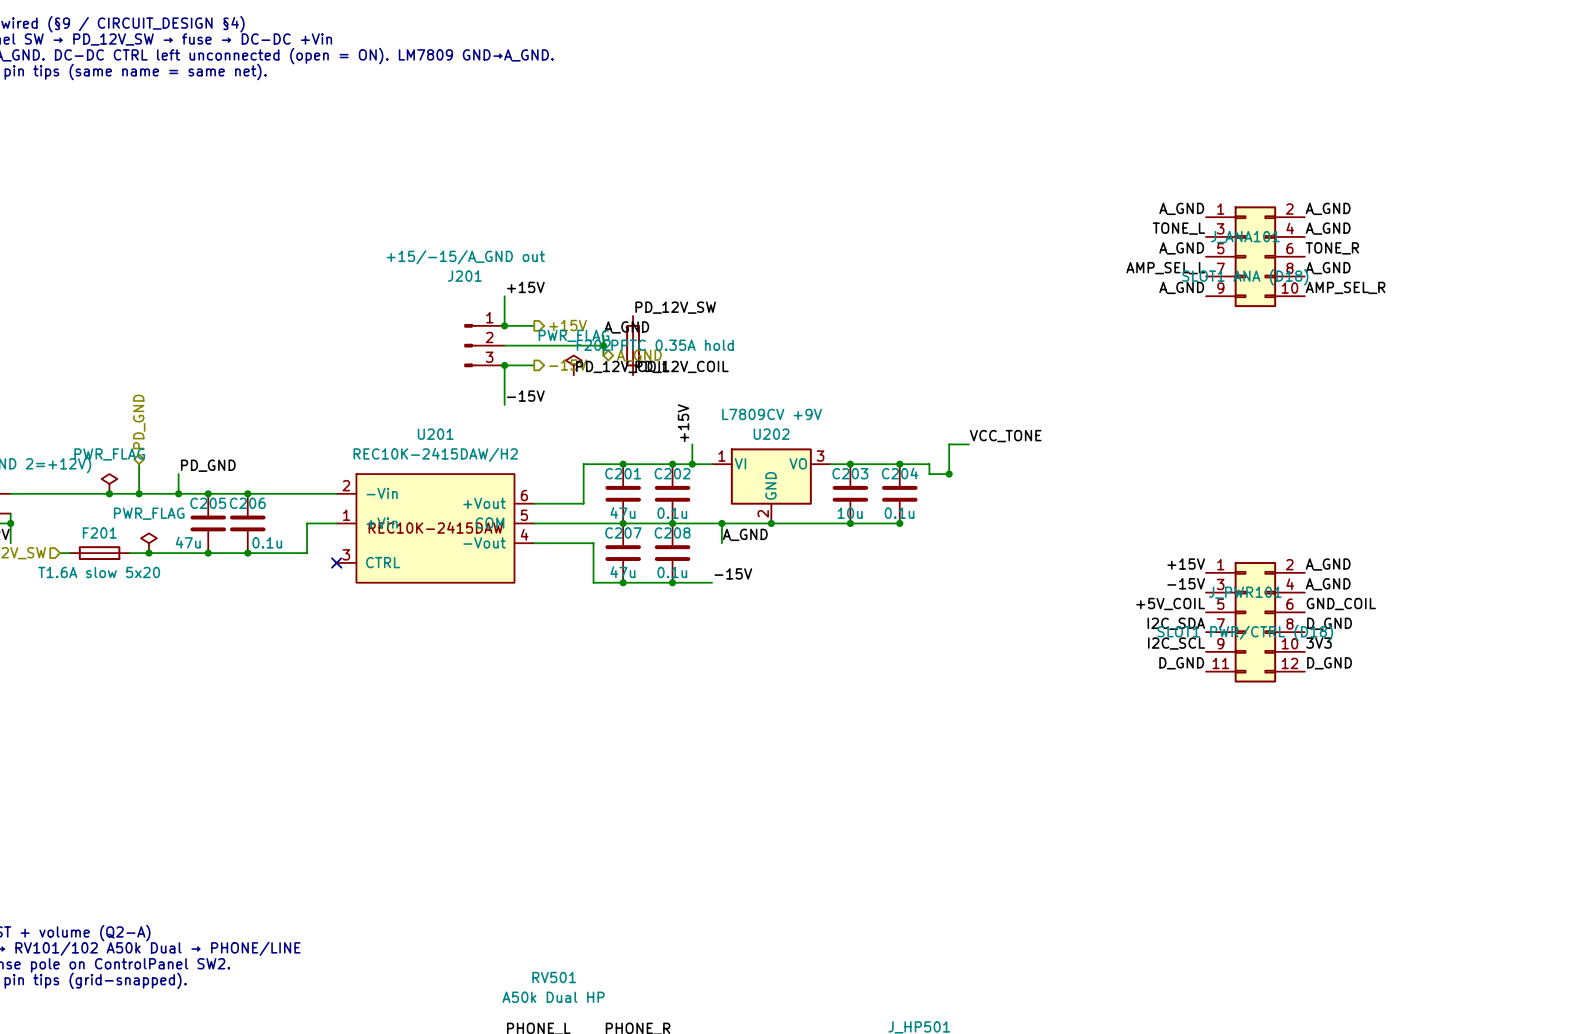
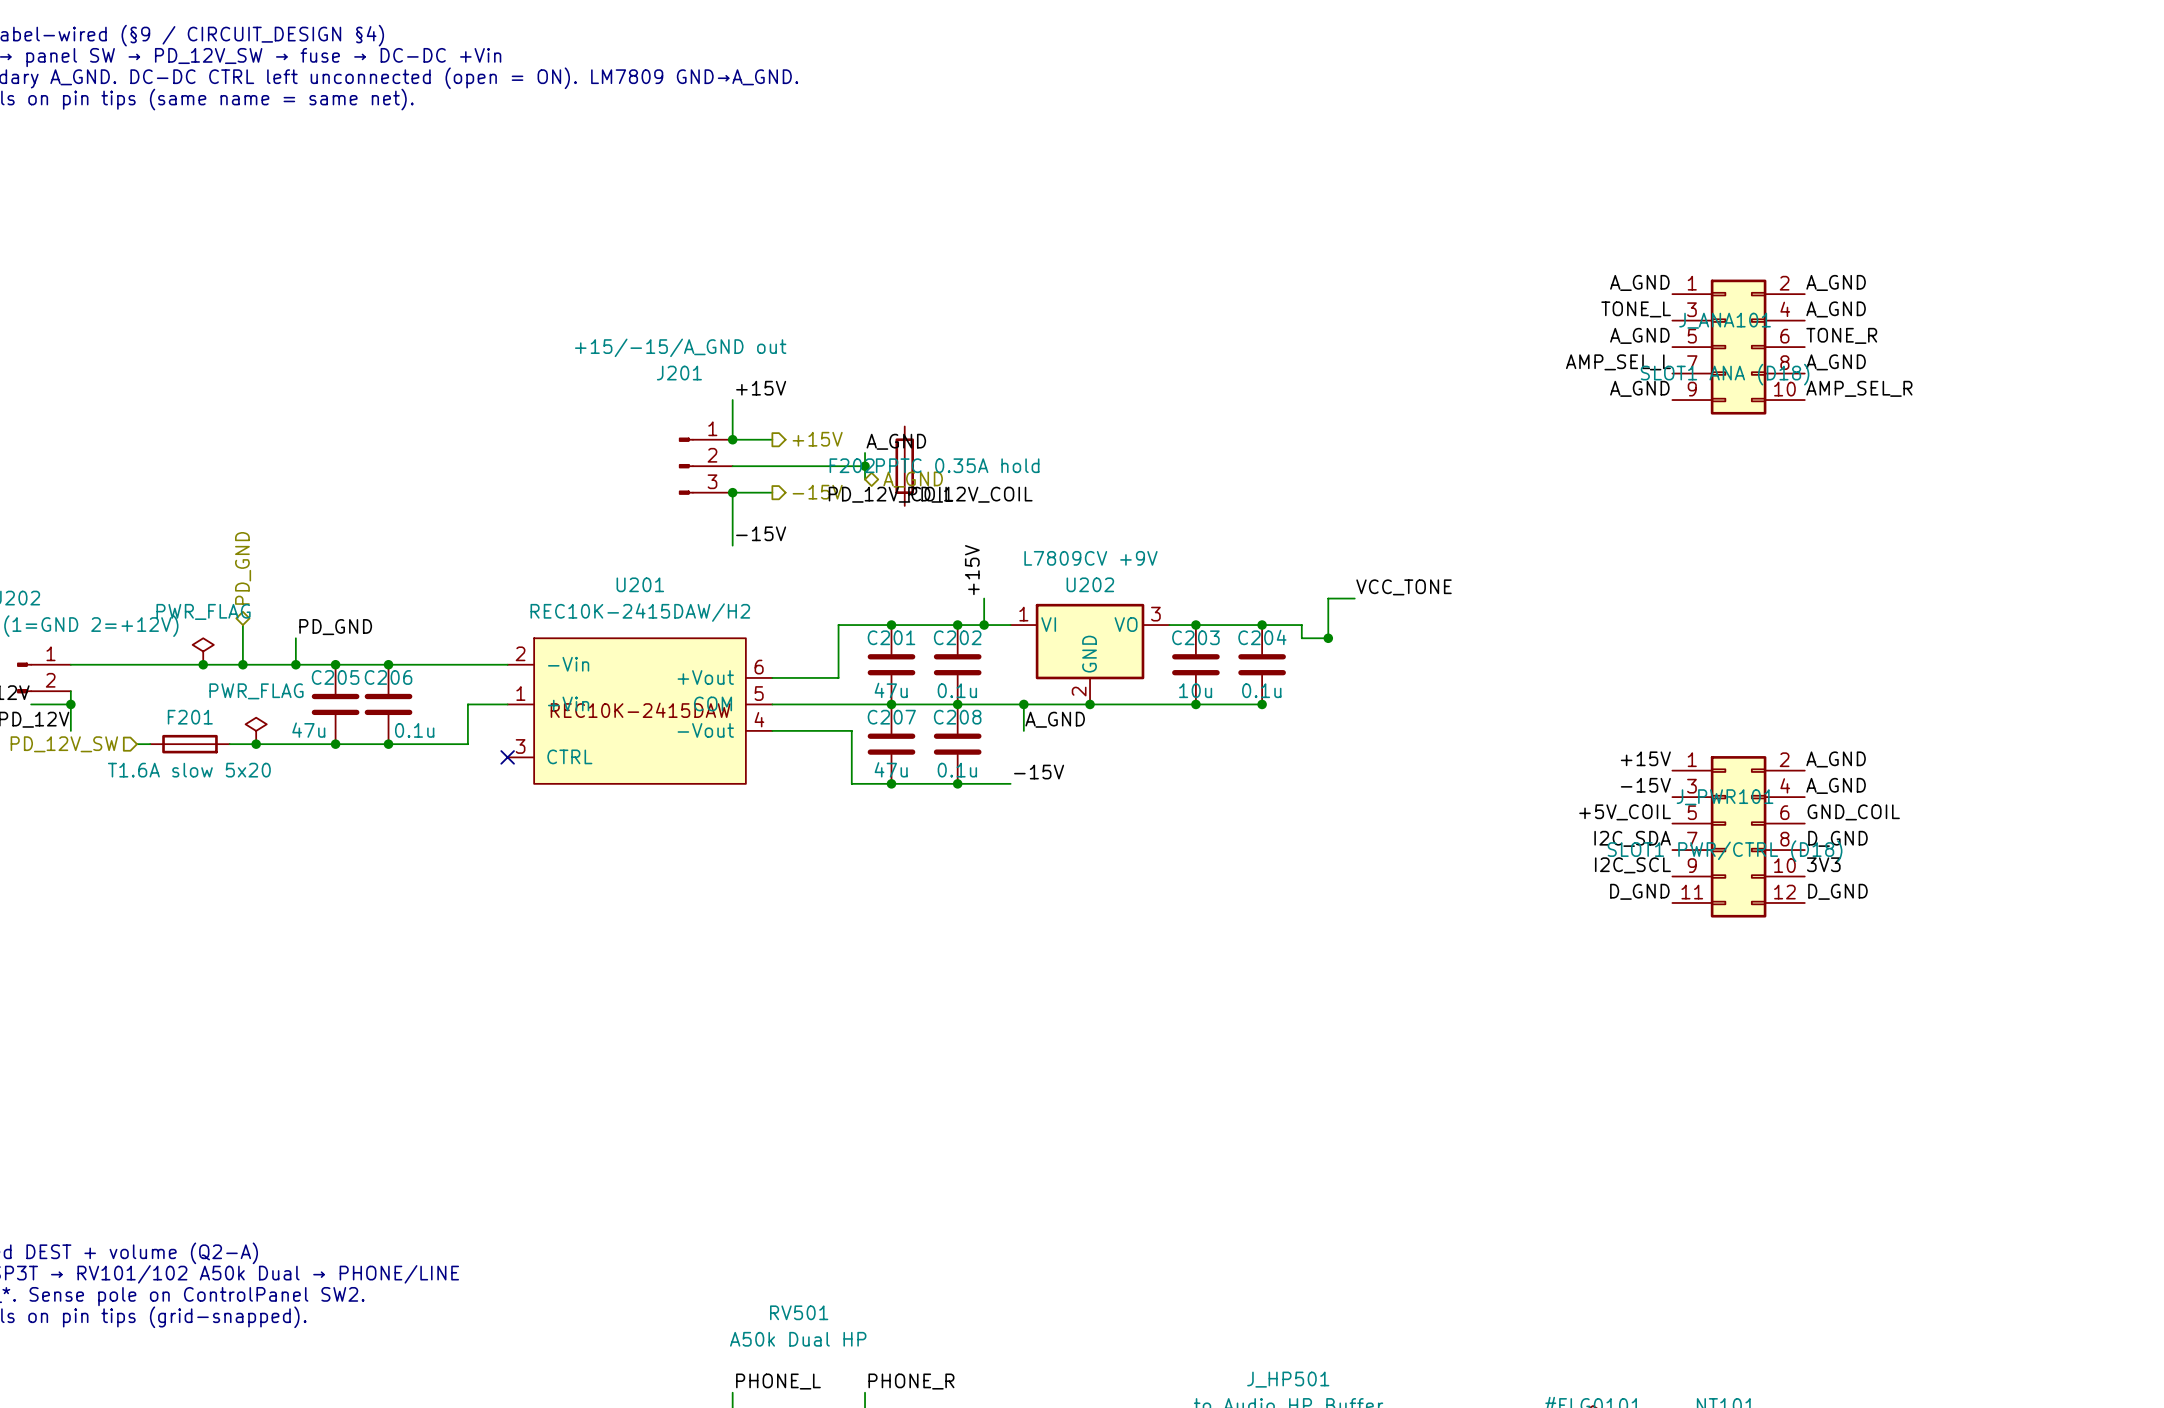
label: PD_12V_SW (675, 307) -> none
power symbol: PWR_FLAG (573, 365) -> none

